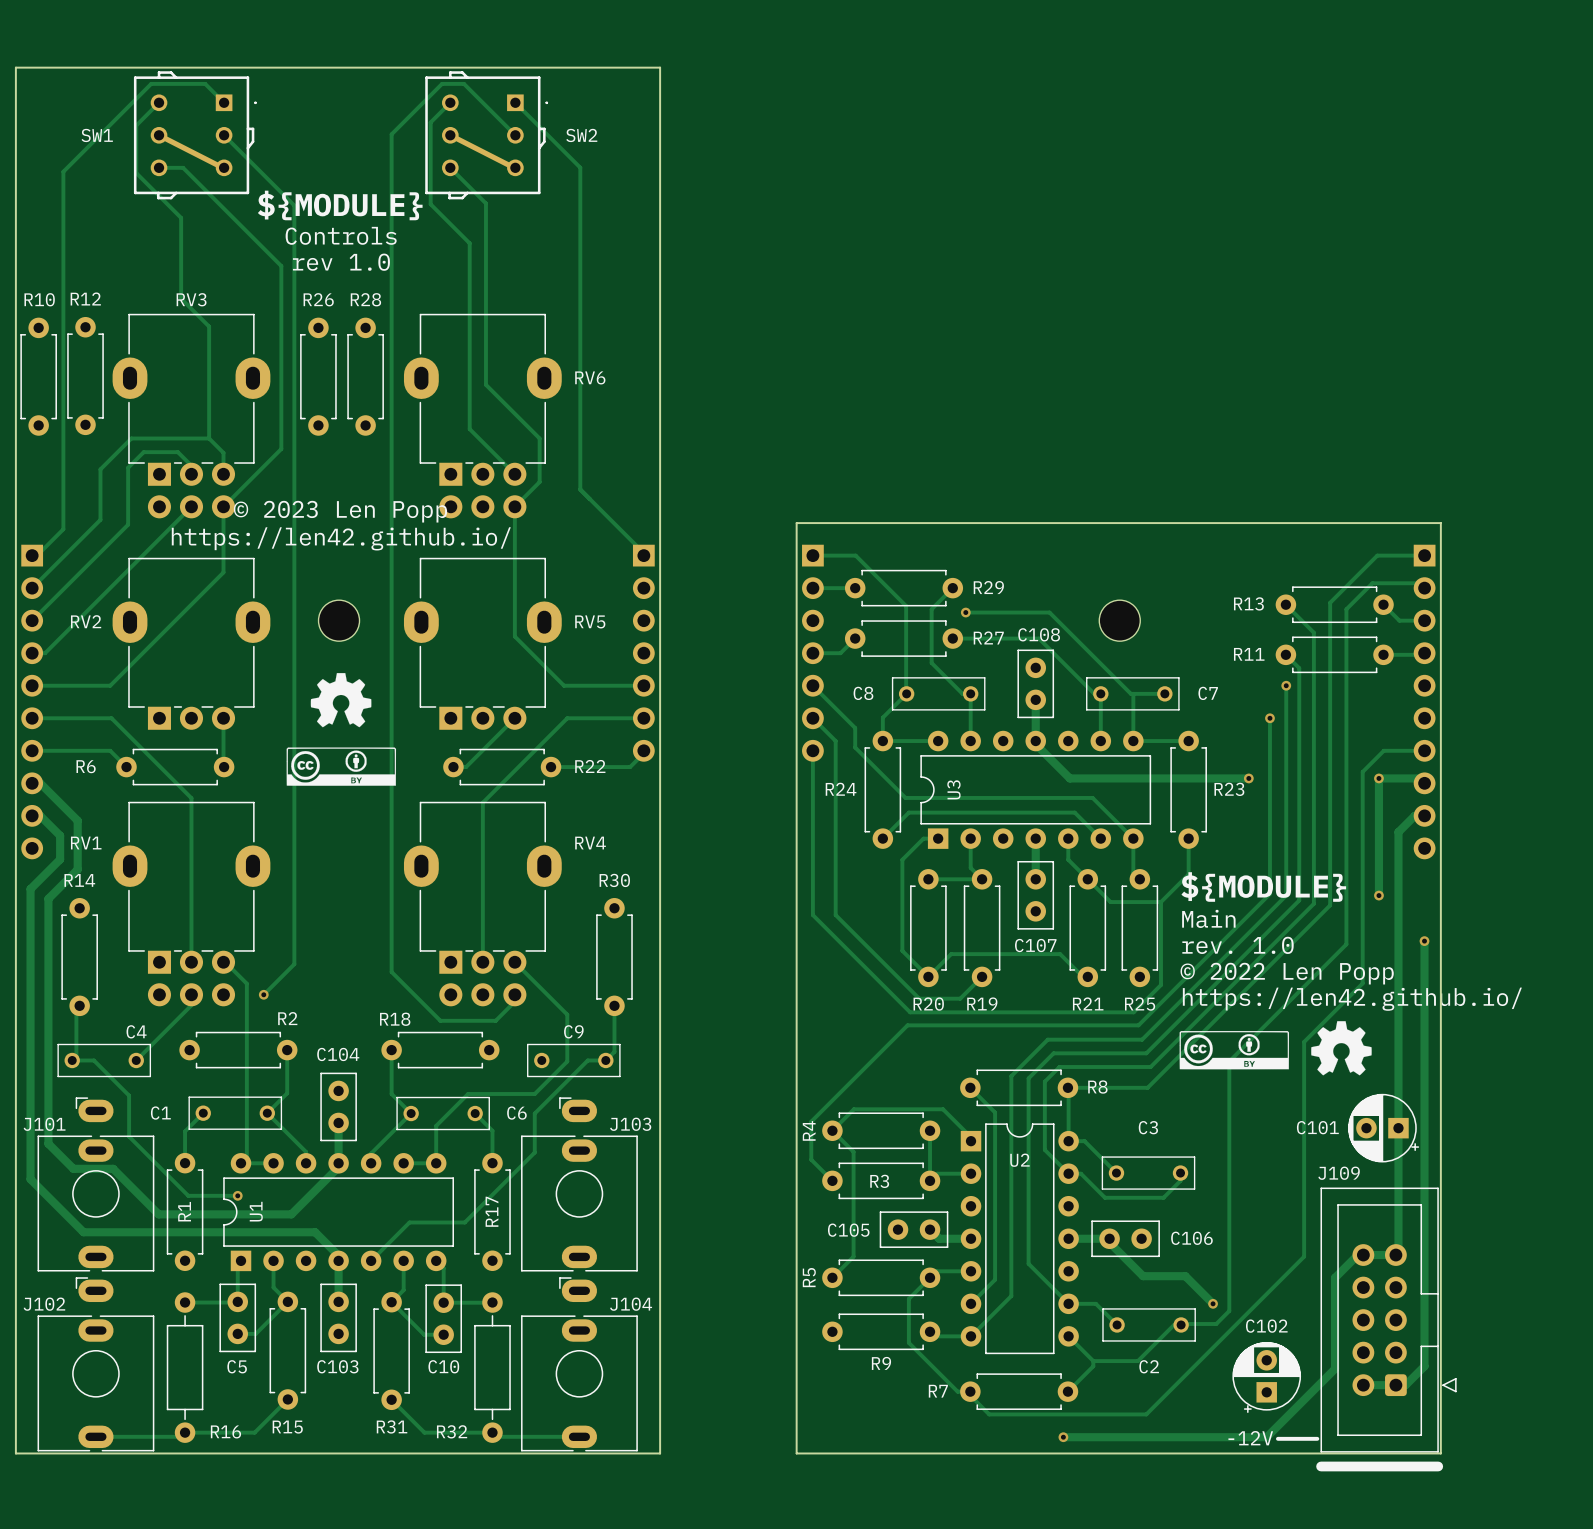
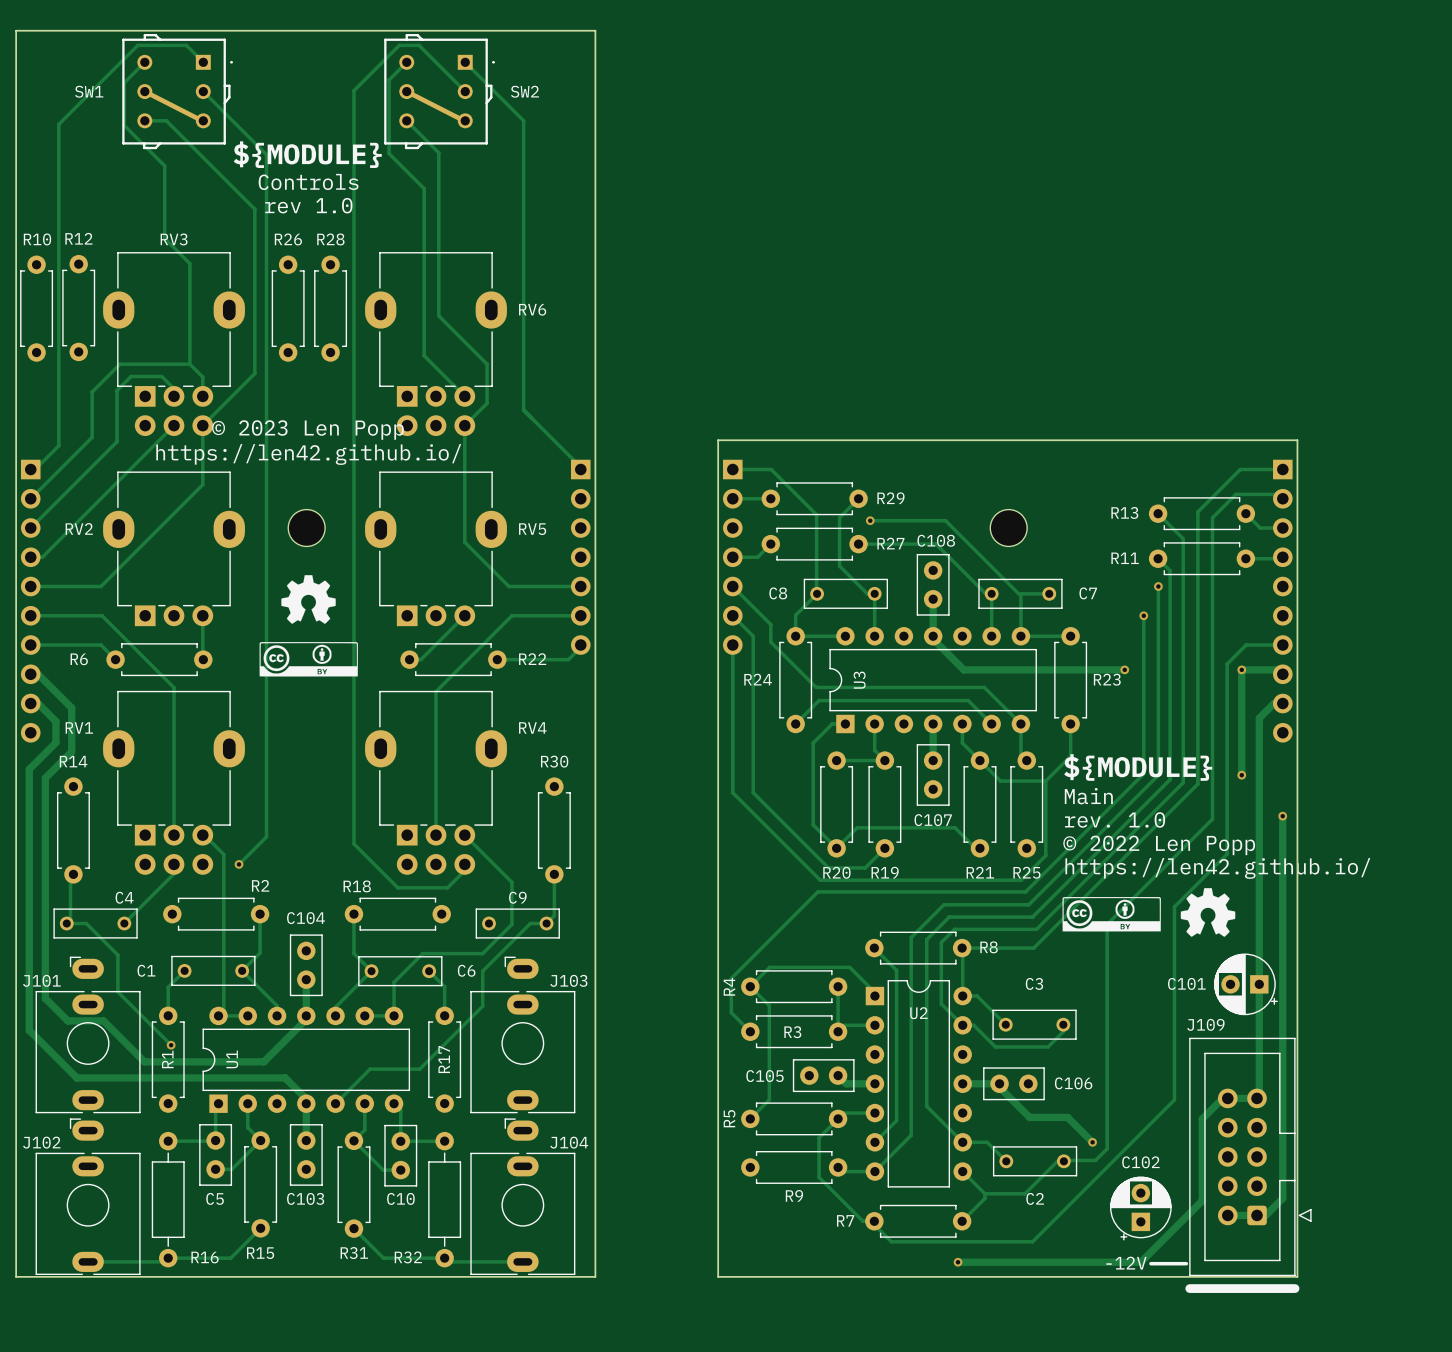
track: (188, 1195) (237, 1195) -> none
via position: (237, 1195) -> (171, 1045)

